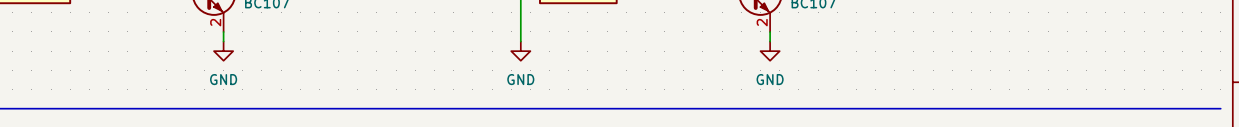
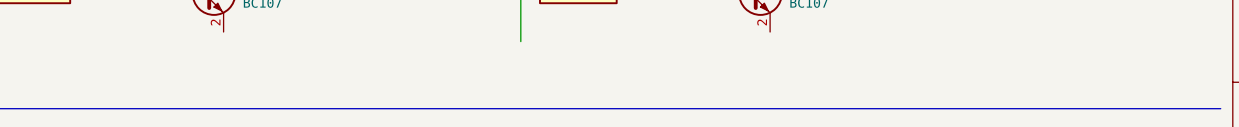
wire: (223, 31) (223, 41) -> none
wire: (770, 31) (770, 41) -> none
power symbol: GND (223, 51) -> none
power symbol: GND (520, 51) -> none
power symbol: GND (770, 51) -> none

